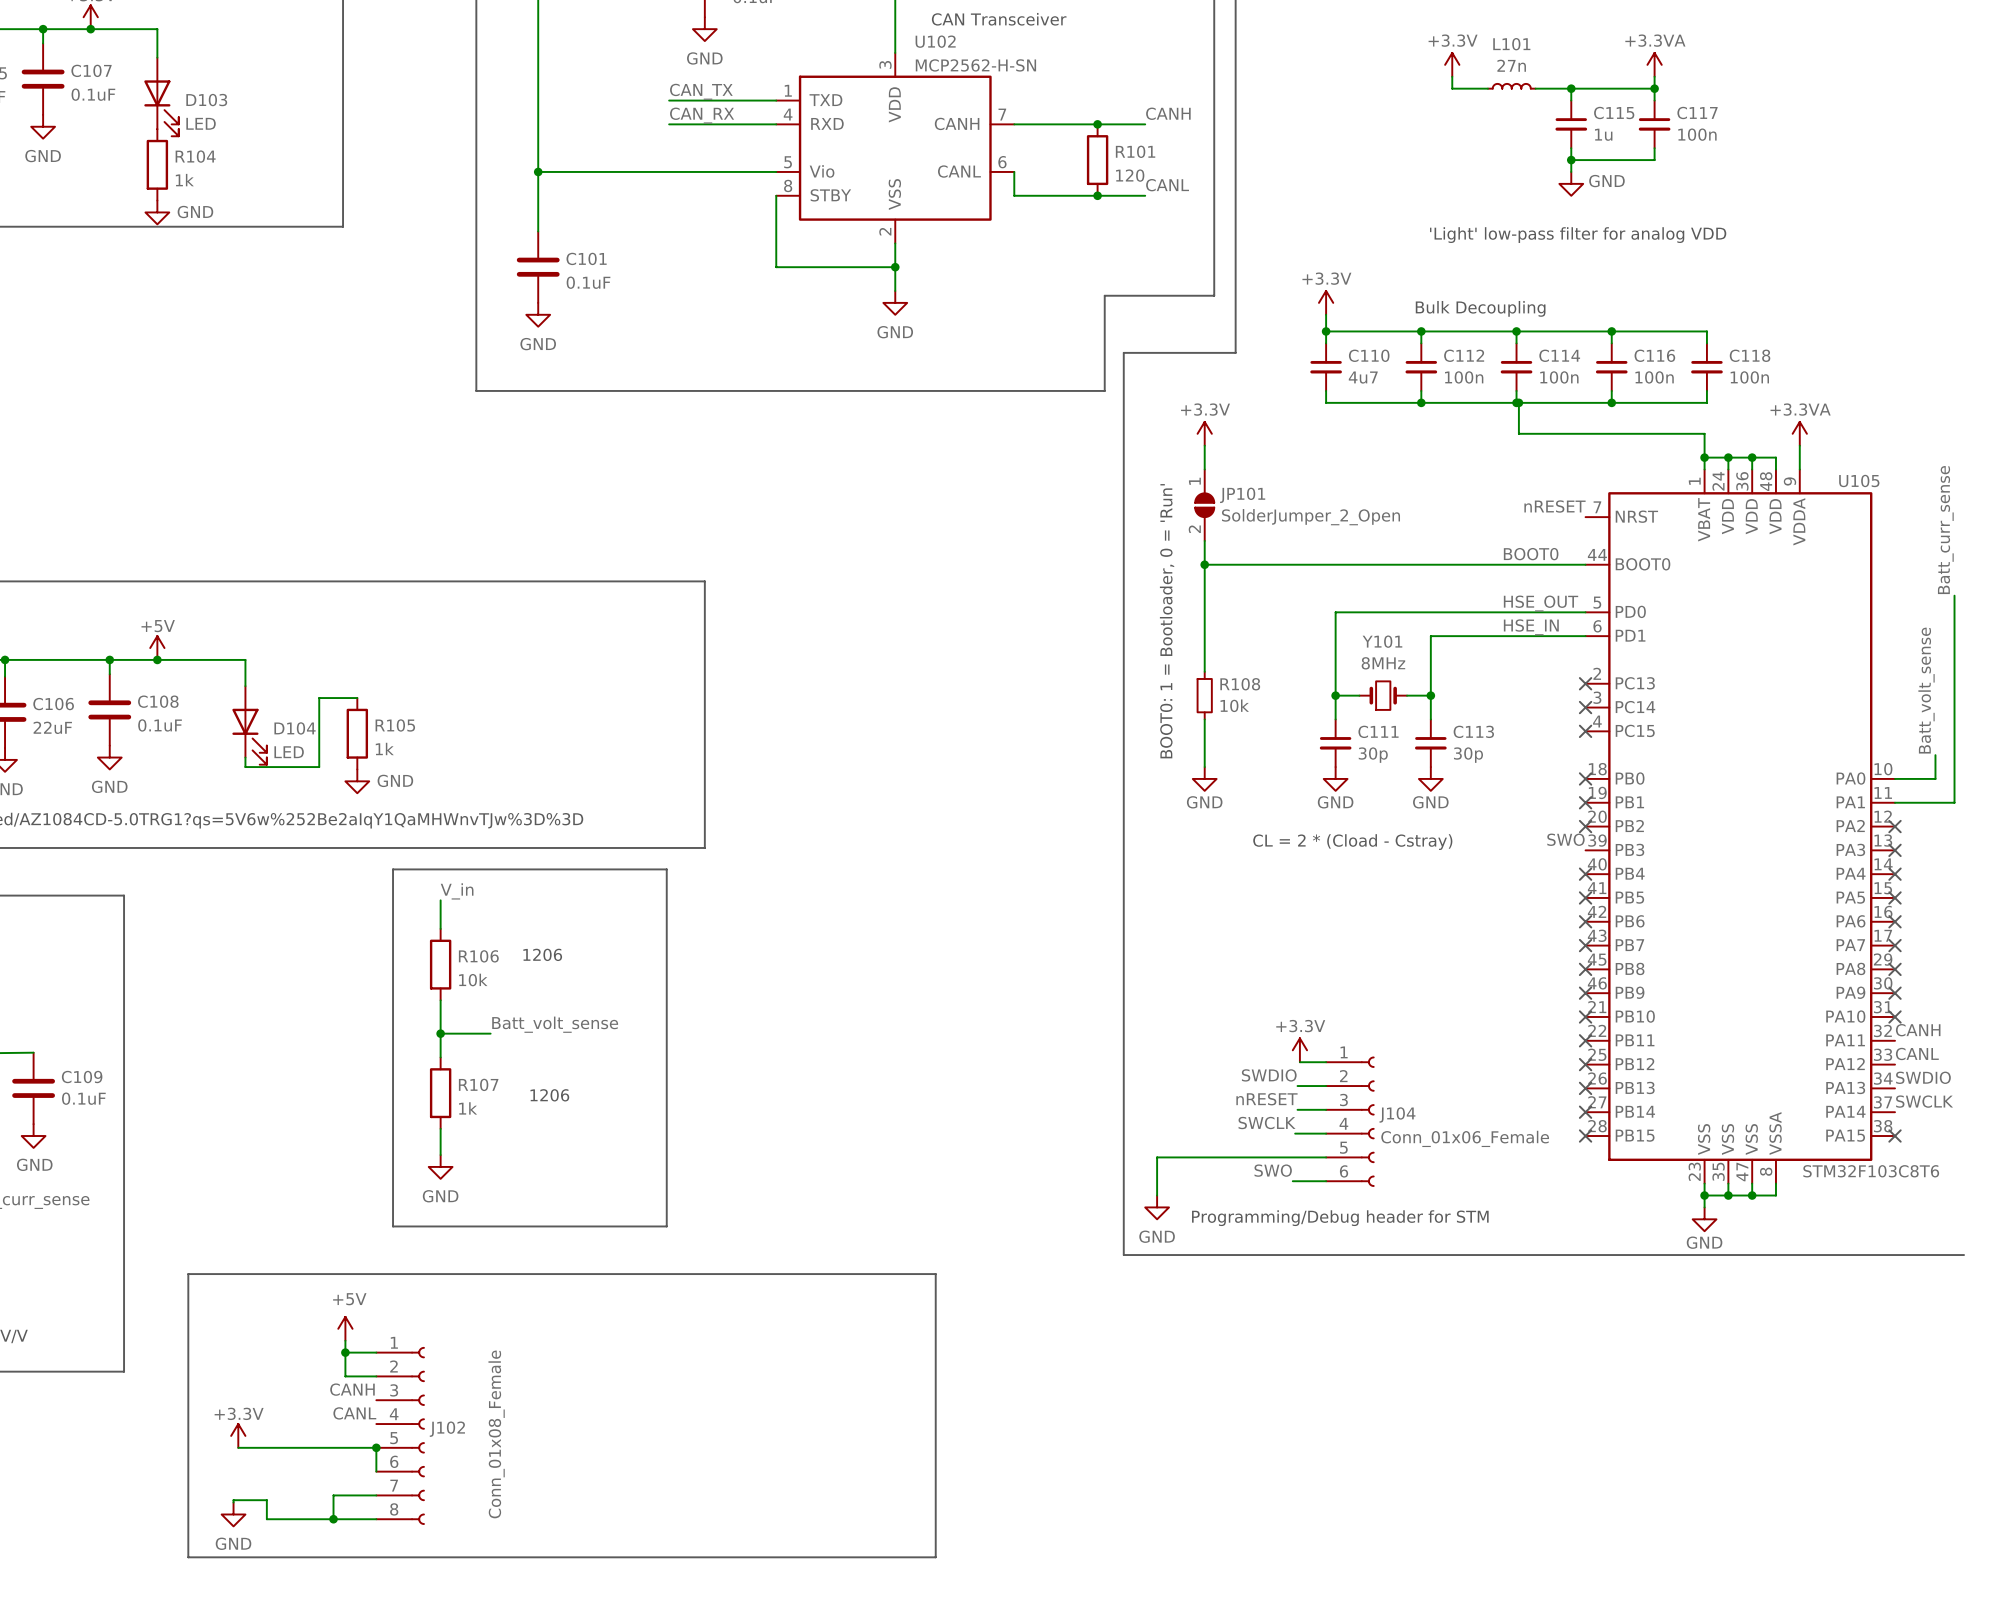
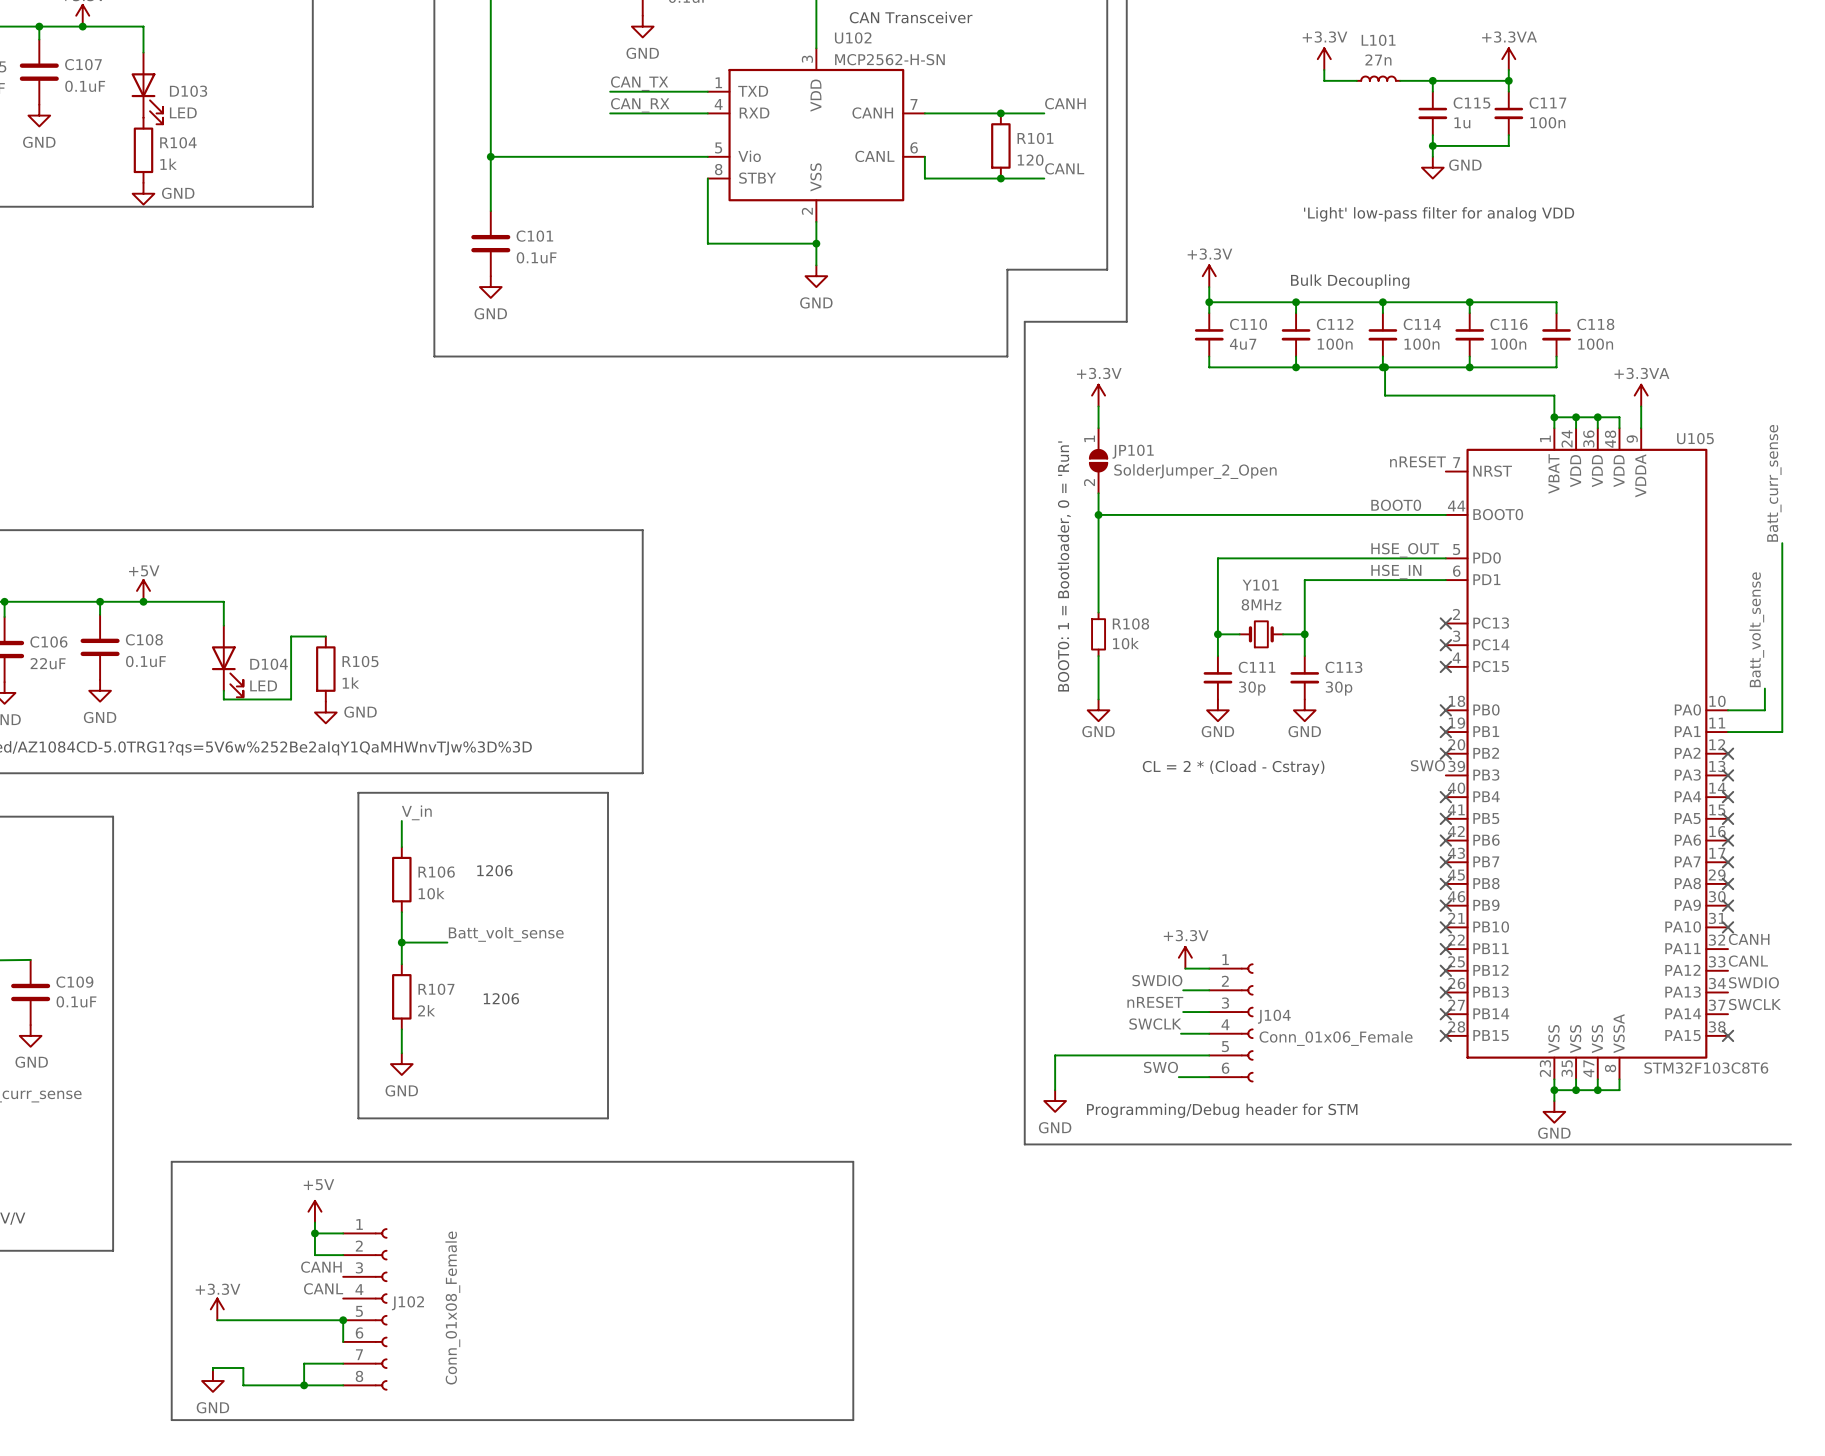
R107 value: 1k (468, 1108) -> 2k (426, 1010)

